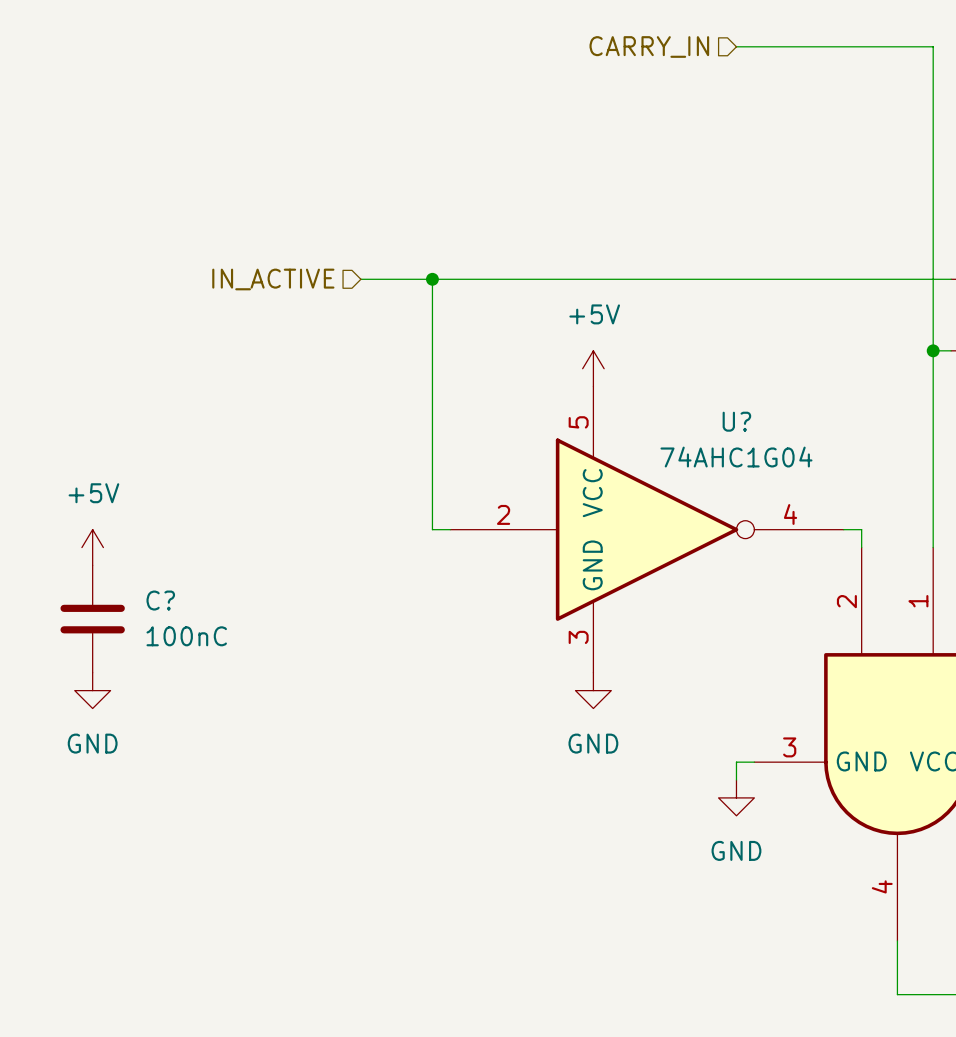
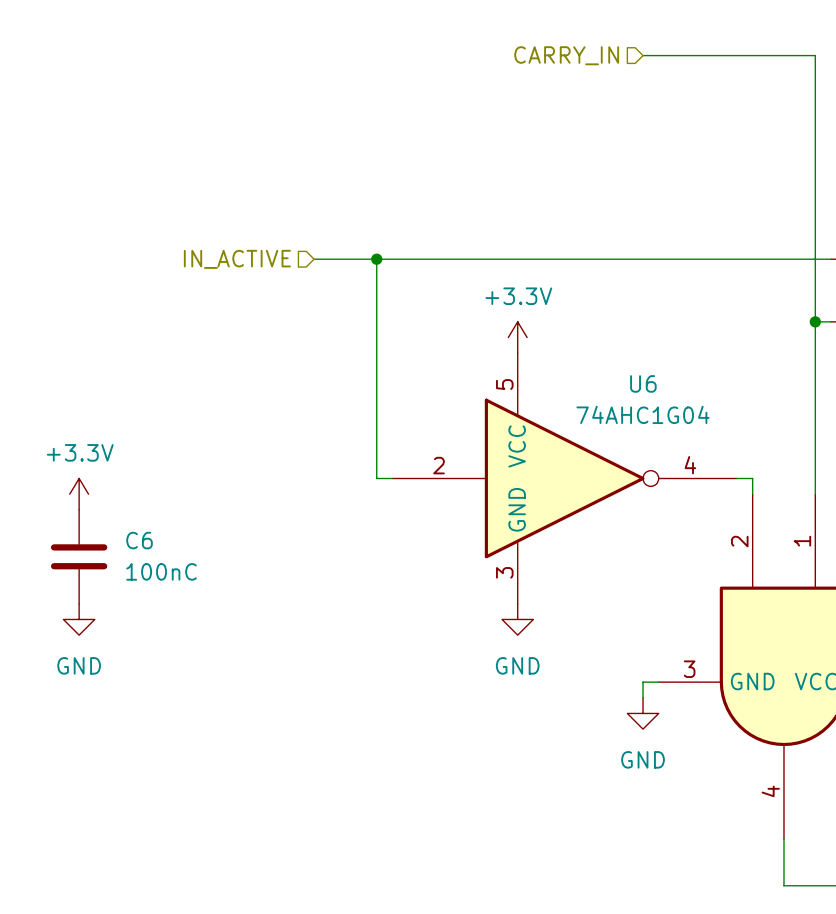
power symbol: +5V (593, 368) -> +3.3V (517, 337)
U? name: U? (736, 421) -> U6 (643, 383)
power symbol: +5V (92, 547) -> +3.3V (79, 494)
C? name: C? (160, 600) -> C6 (139, 540)

